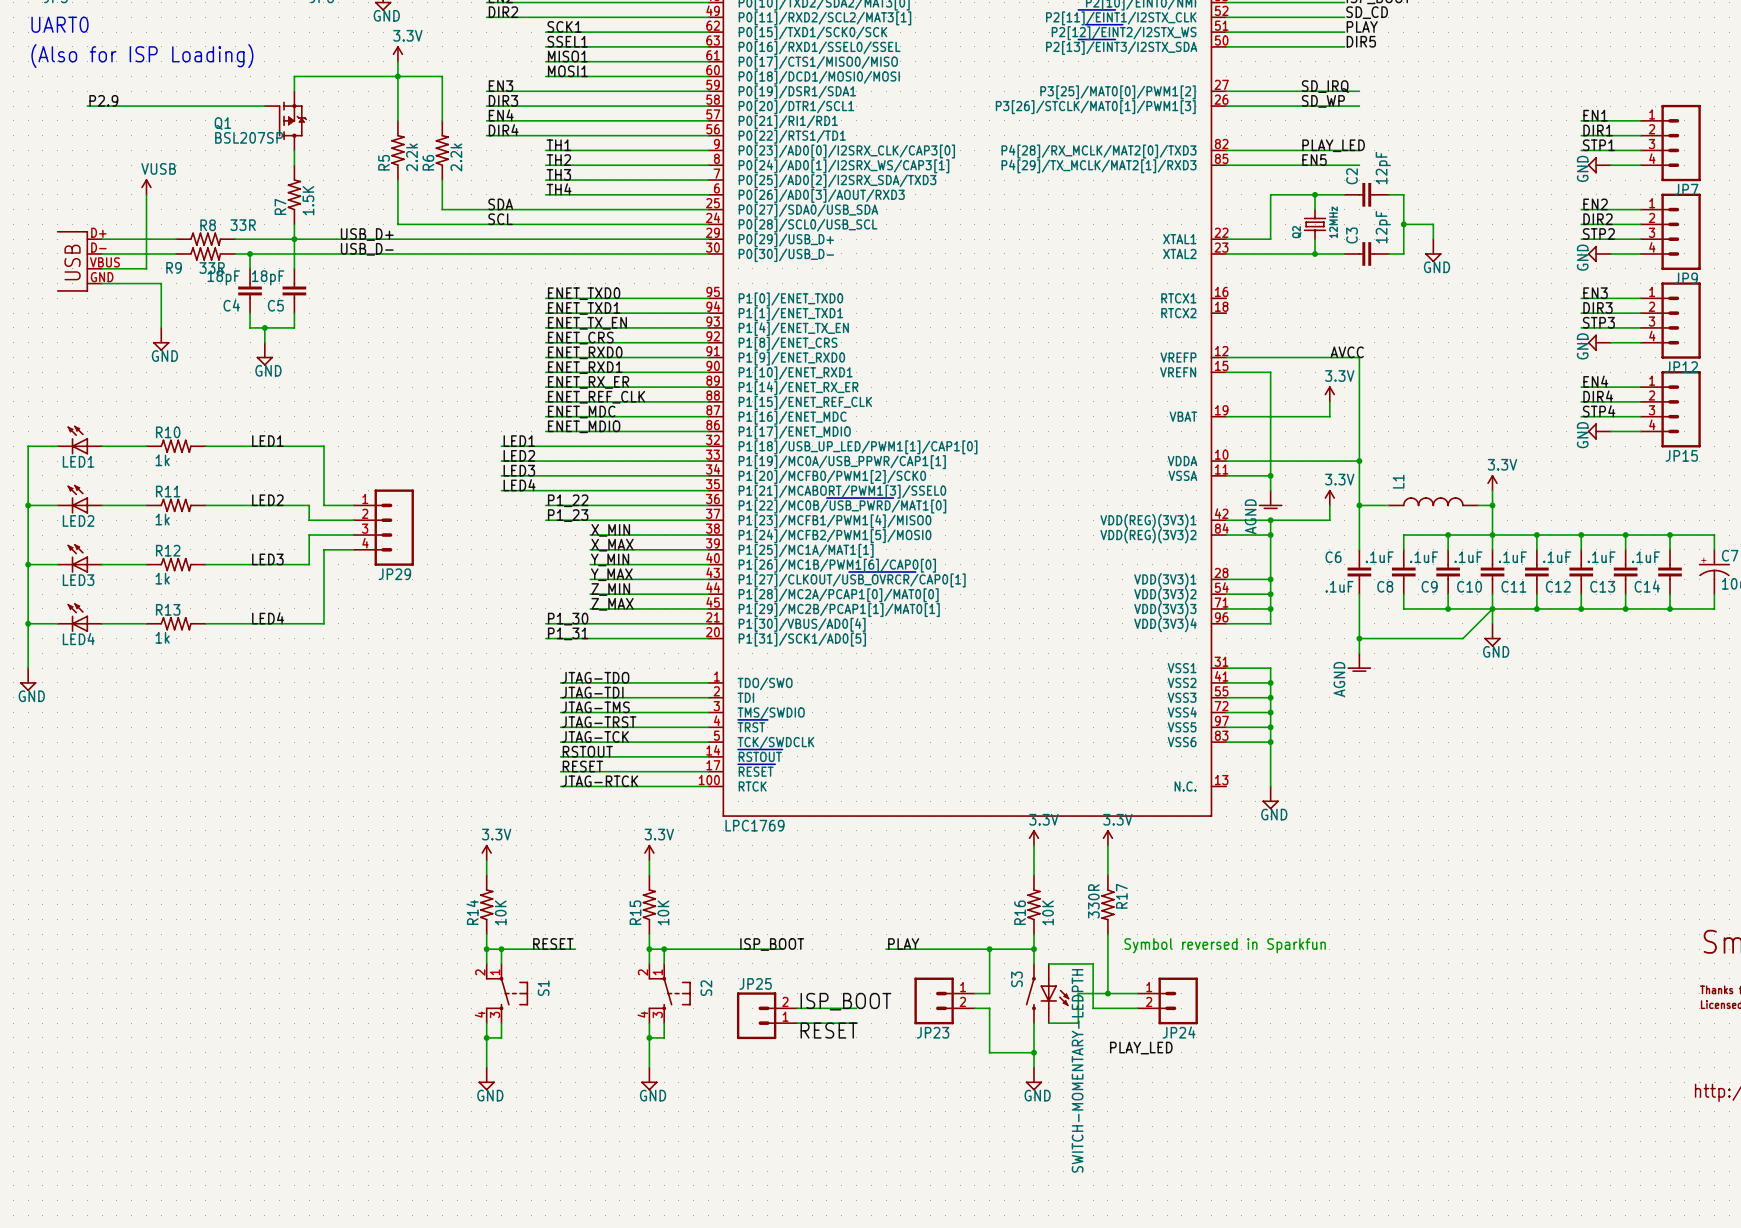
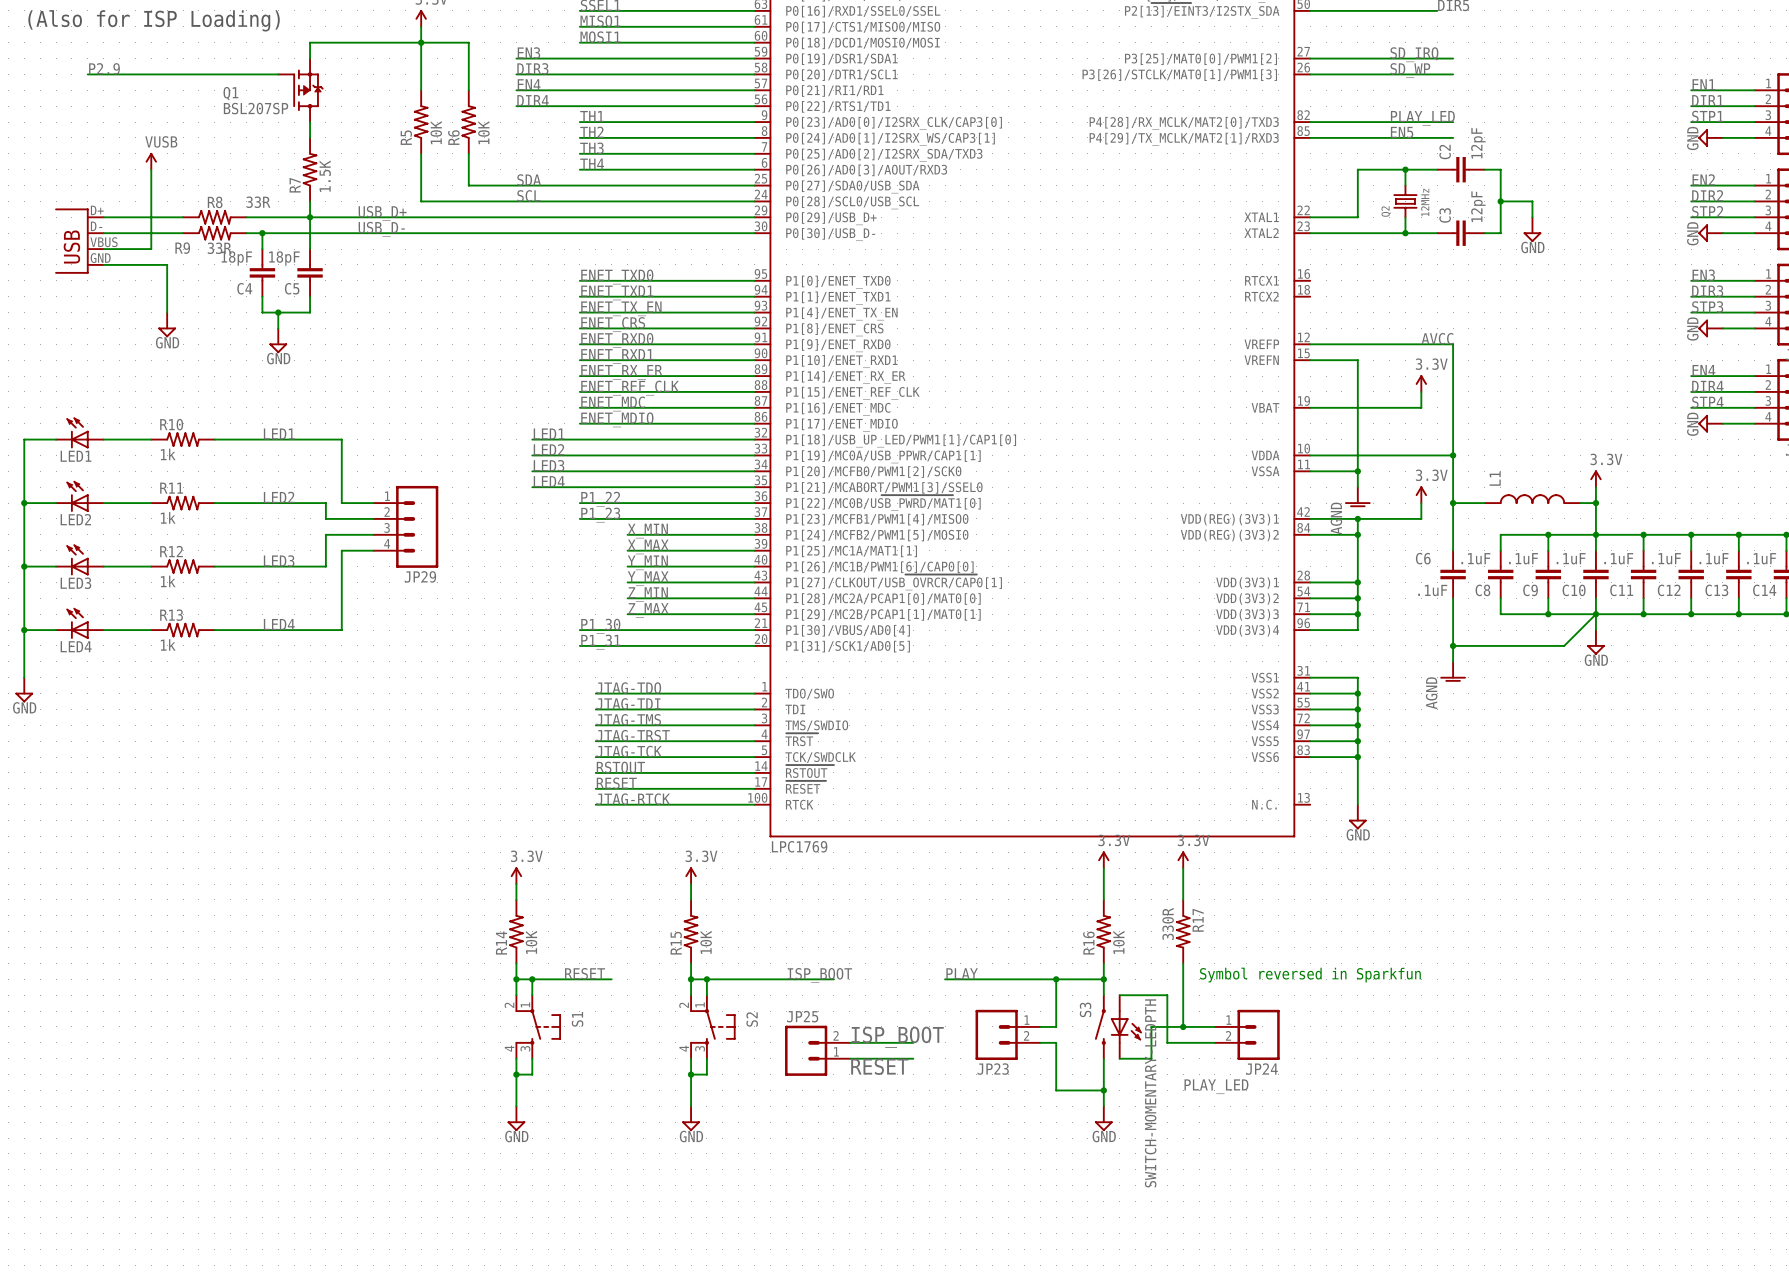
R5 value: 2.2k (411, 157) -> 10K (436, 132)
R6 value: 2.2k (456, 157) -> 10K (483, 132)

